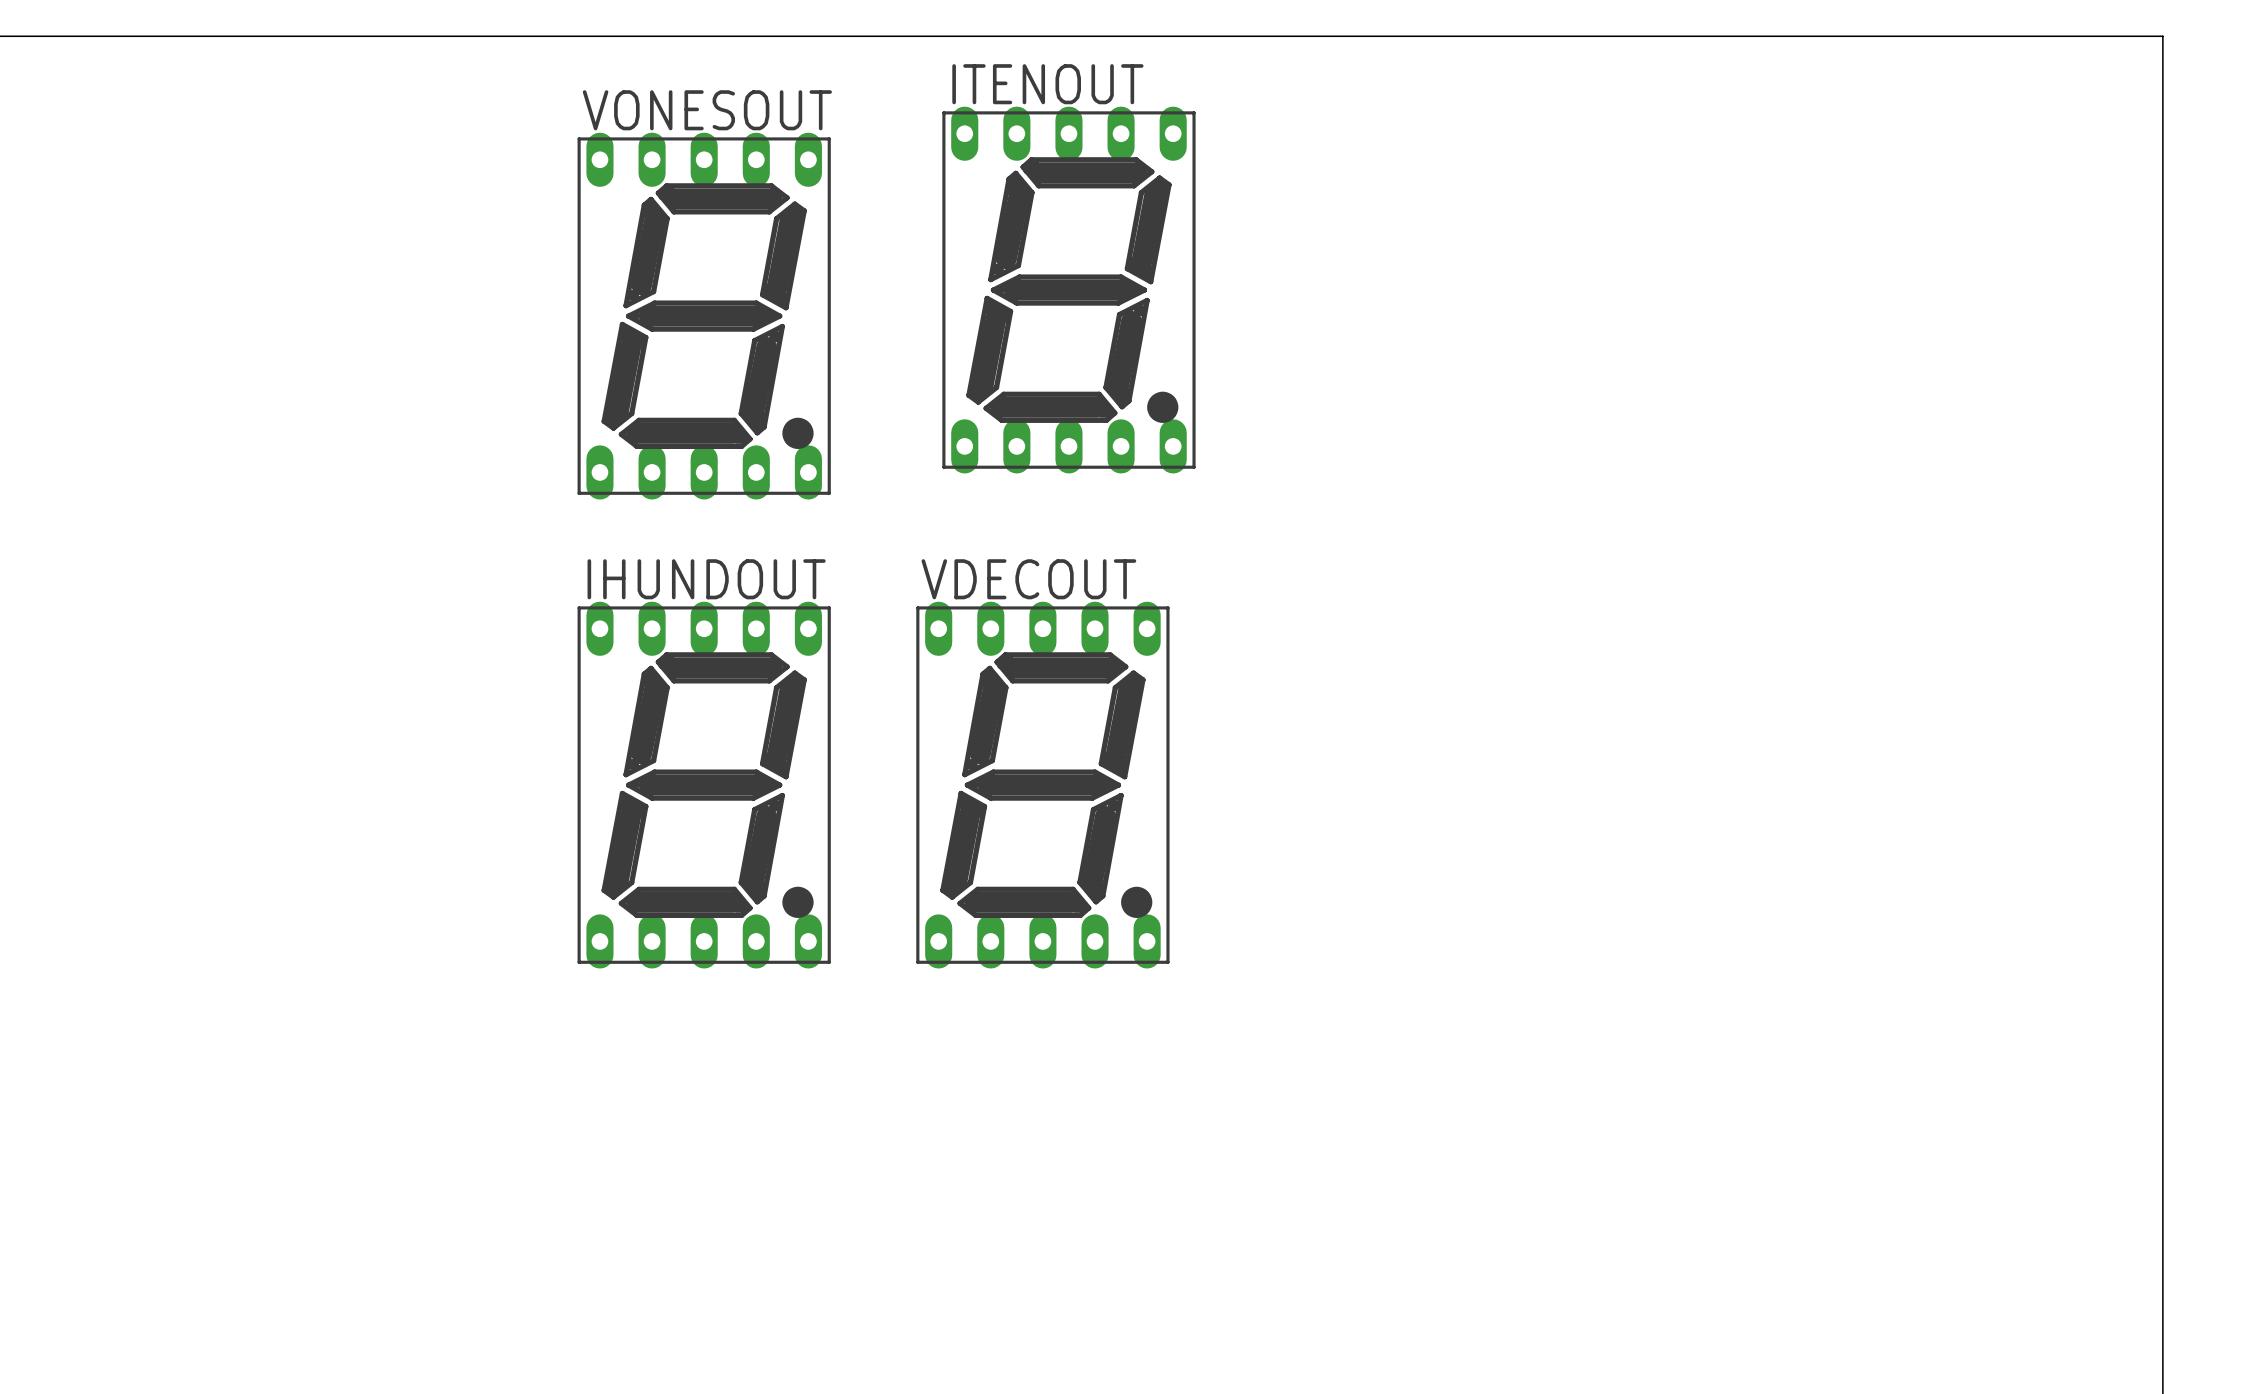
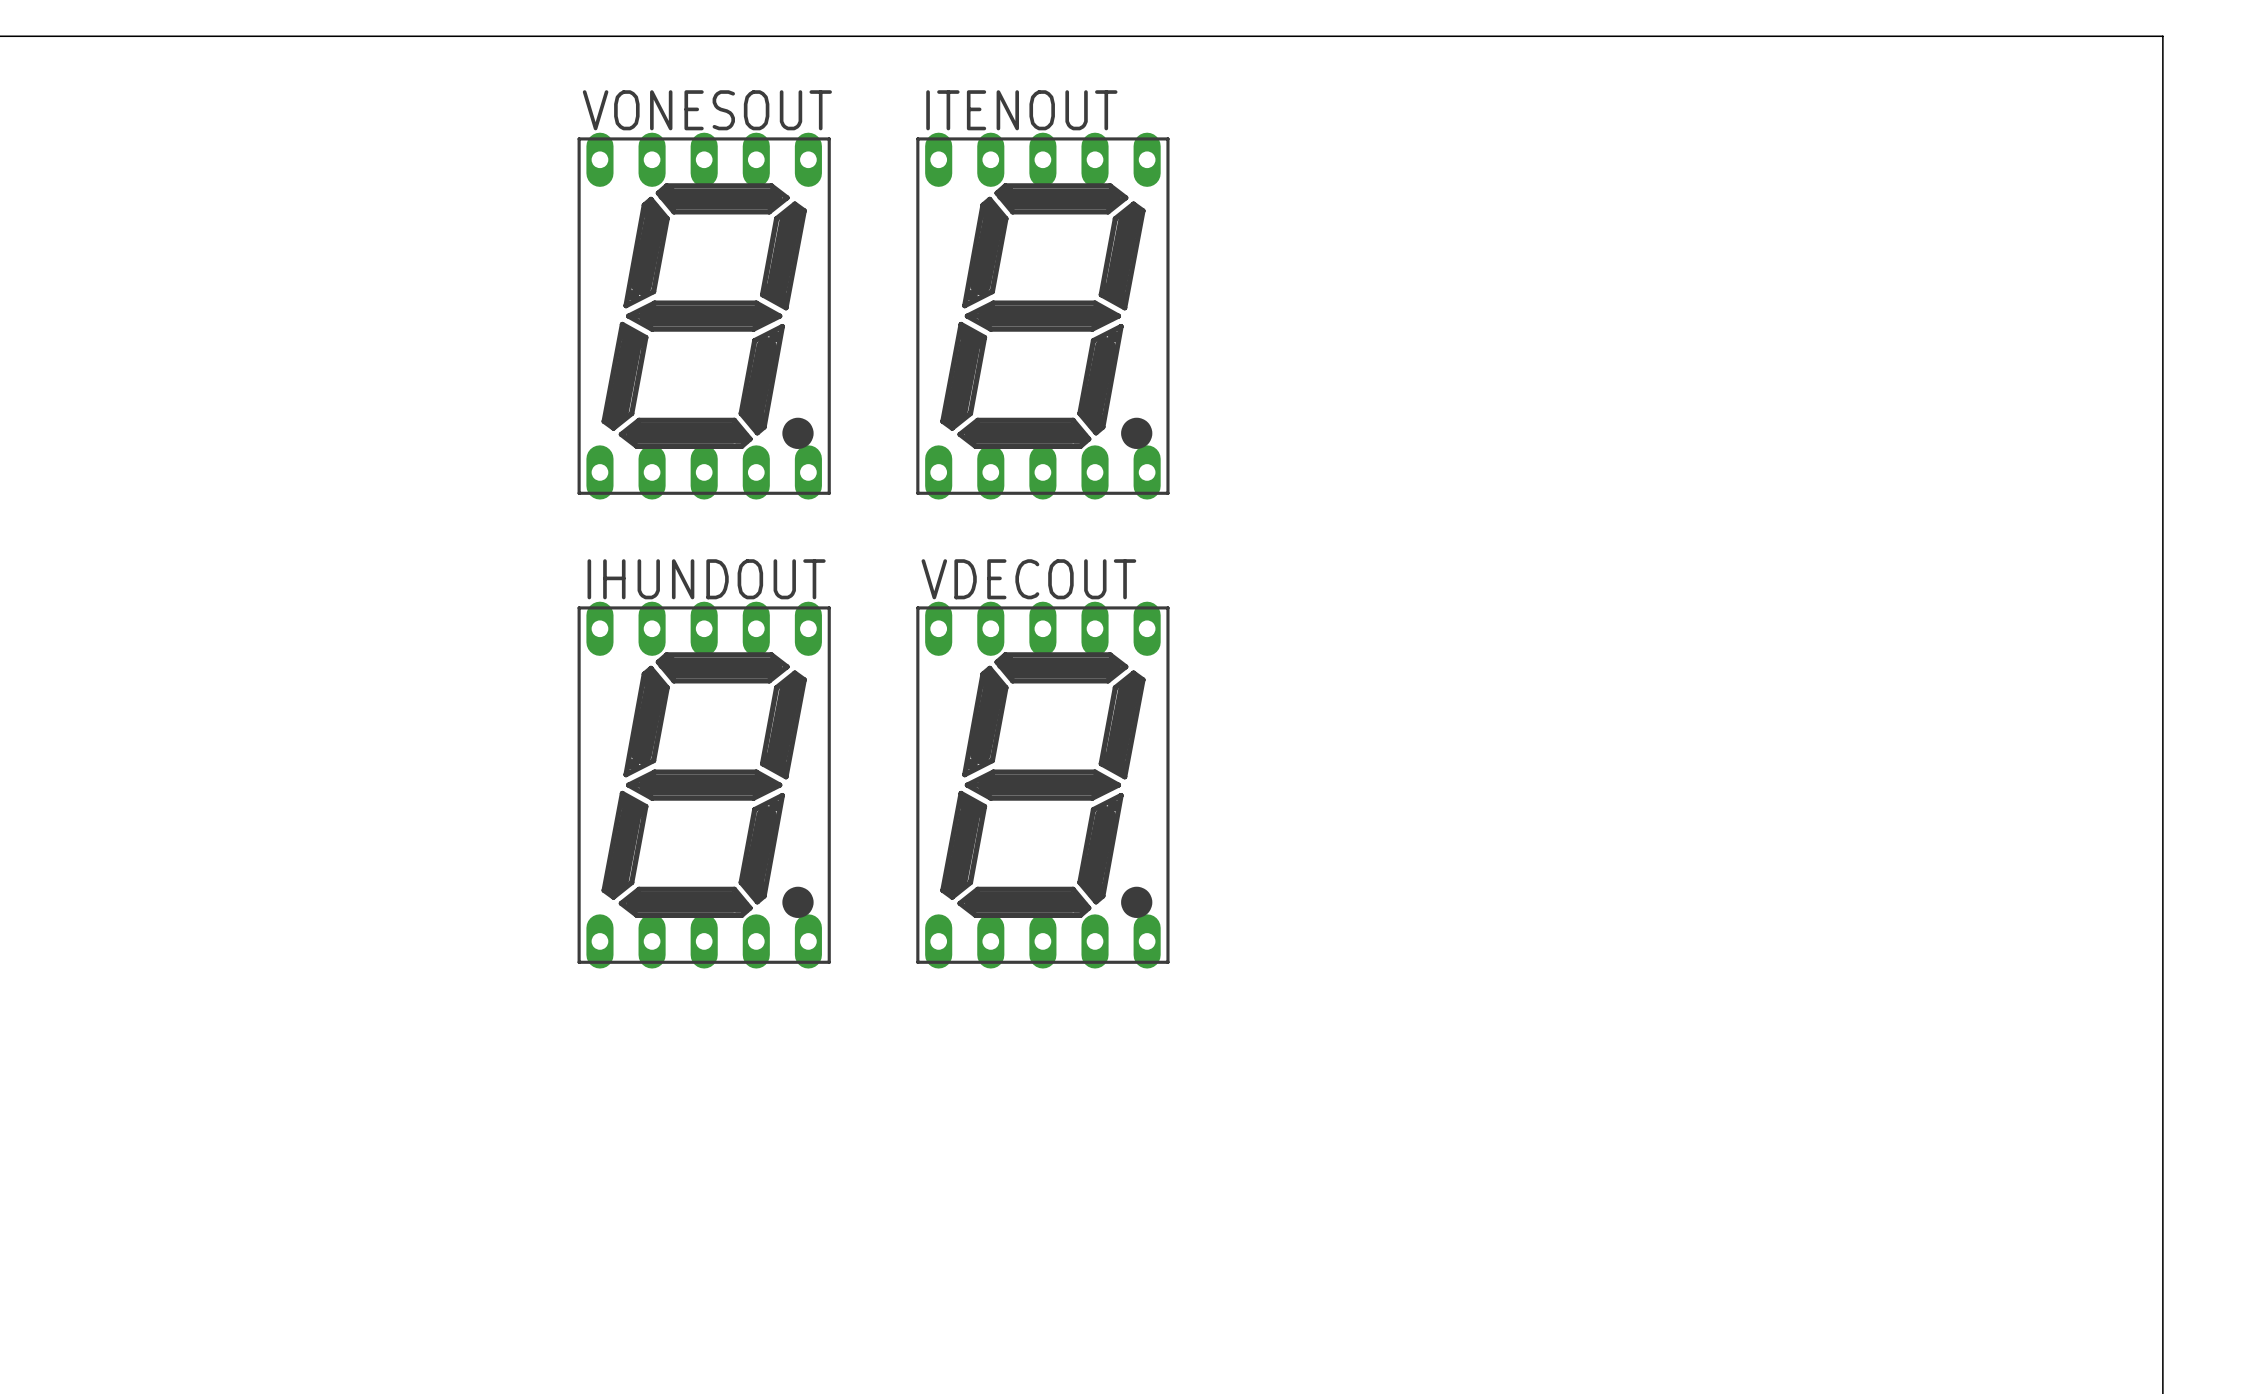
ITENOUT position: (1068, 290) -> (1042, 316)

